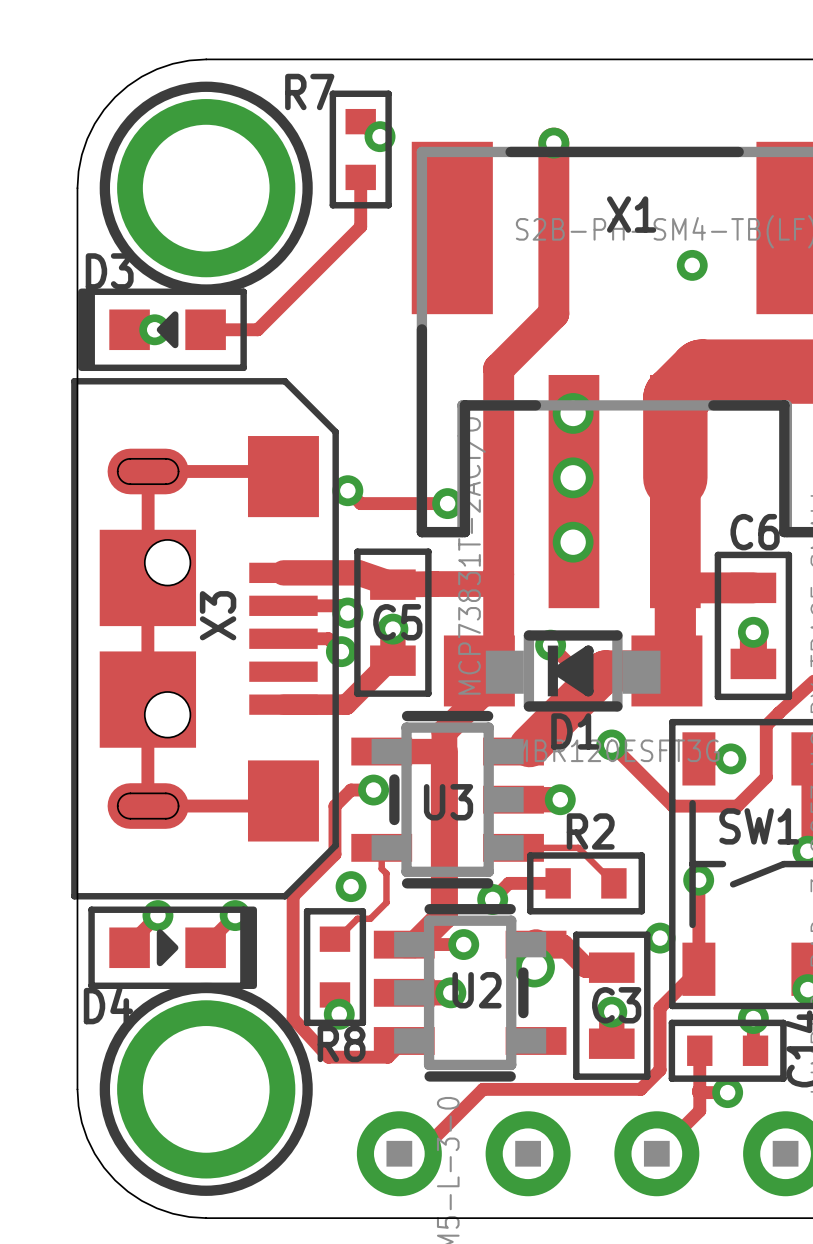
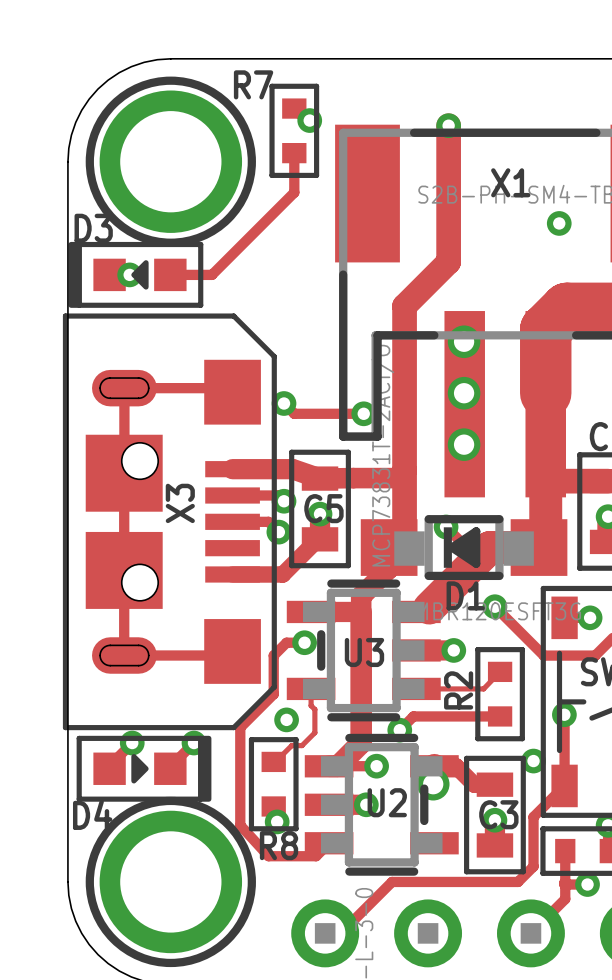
track: (578, 847) (613, 883) -> (468, 688) (483, 688) (500, 671)
track: (508, 883) (558, 883) -> (412, 717) (500, 716)
R2 rotation: 0° (586, 883) -> 90° clockwise (500, 694)

